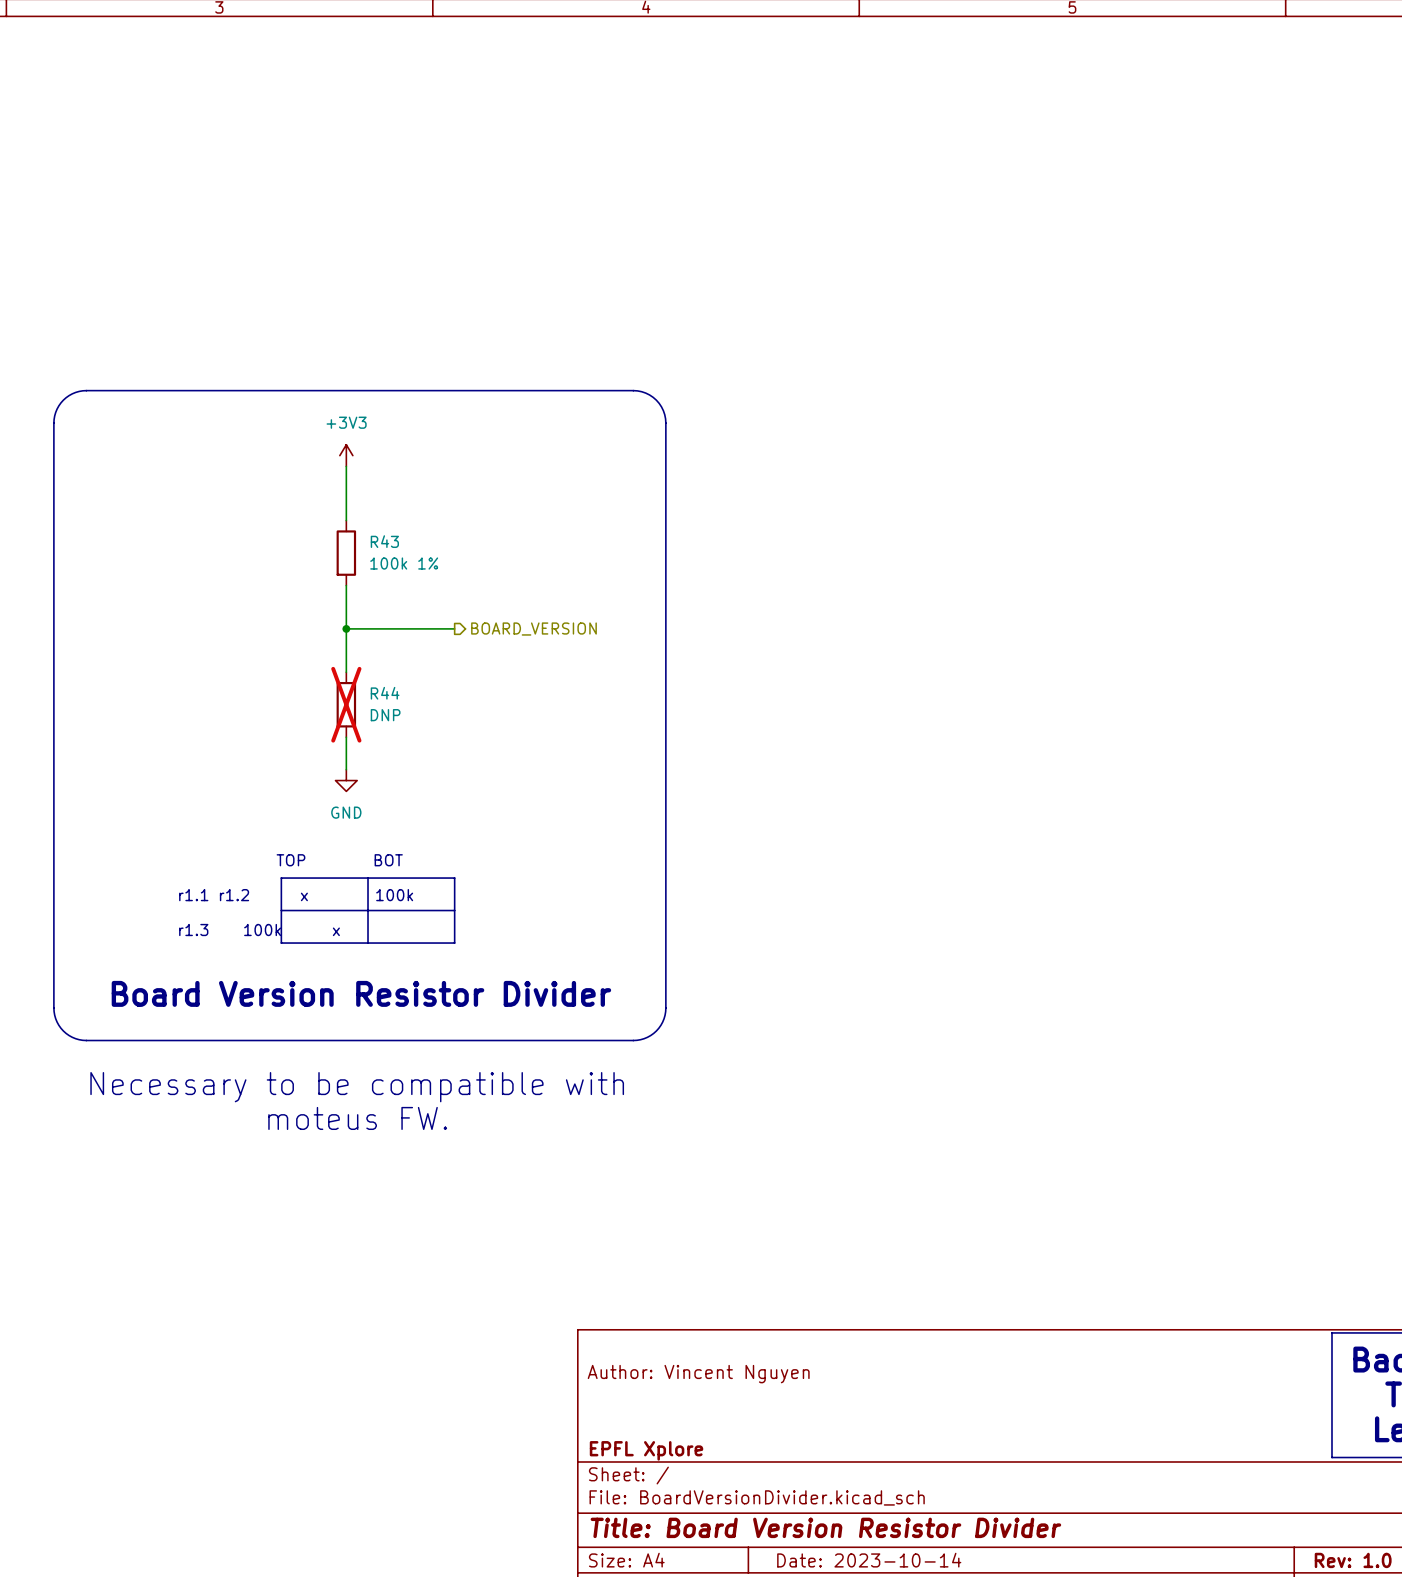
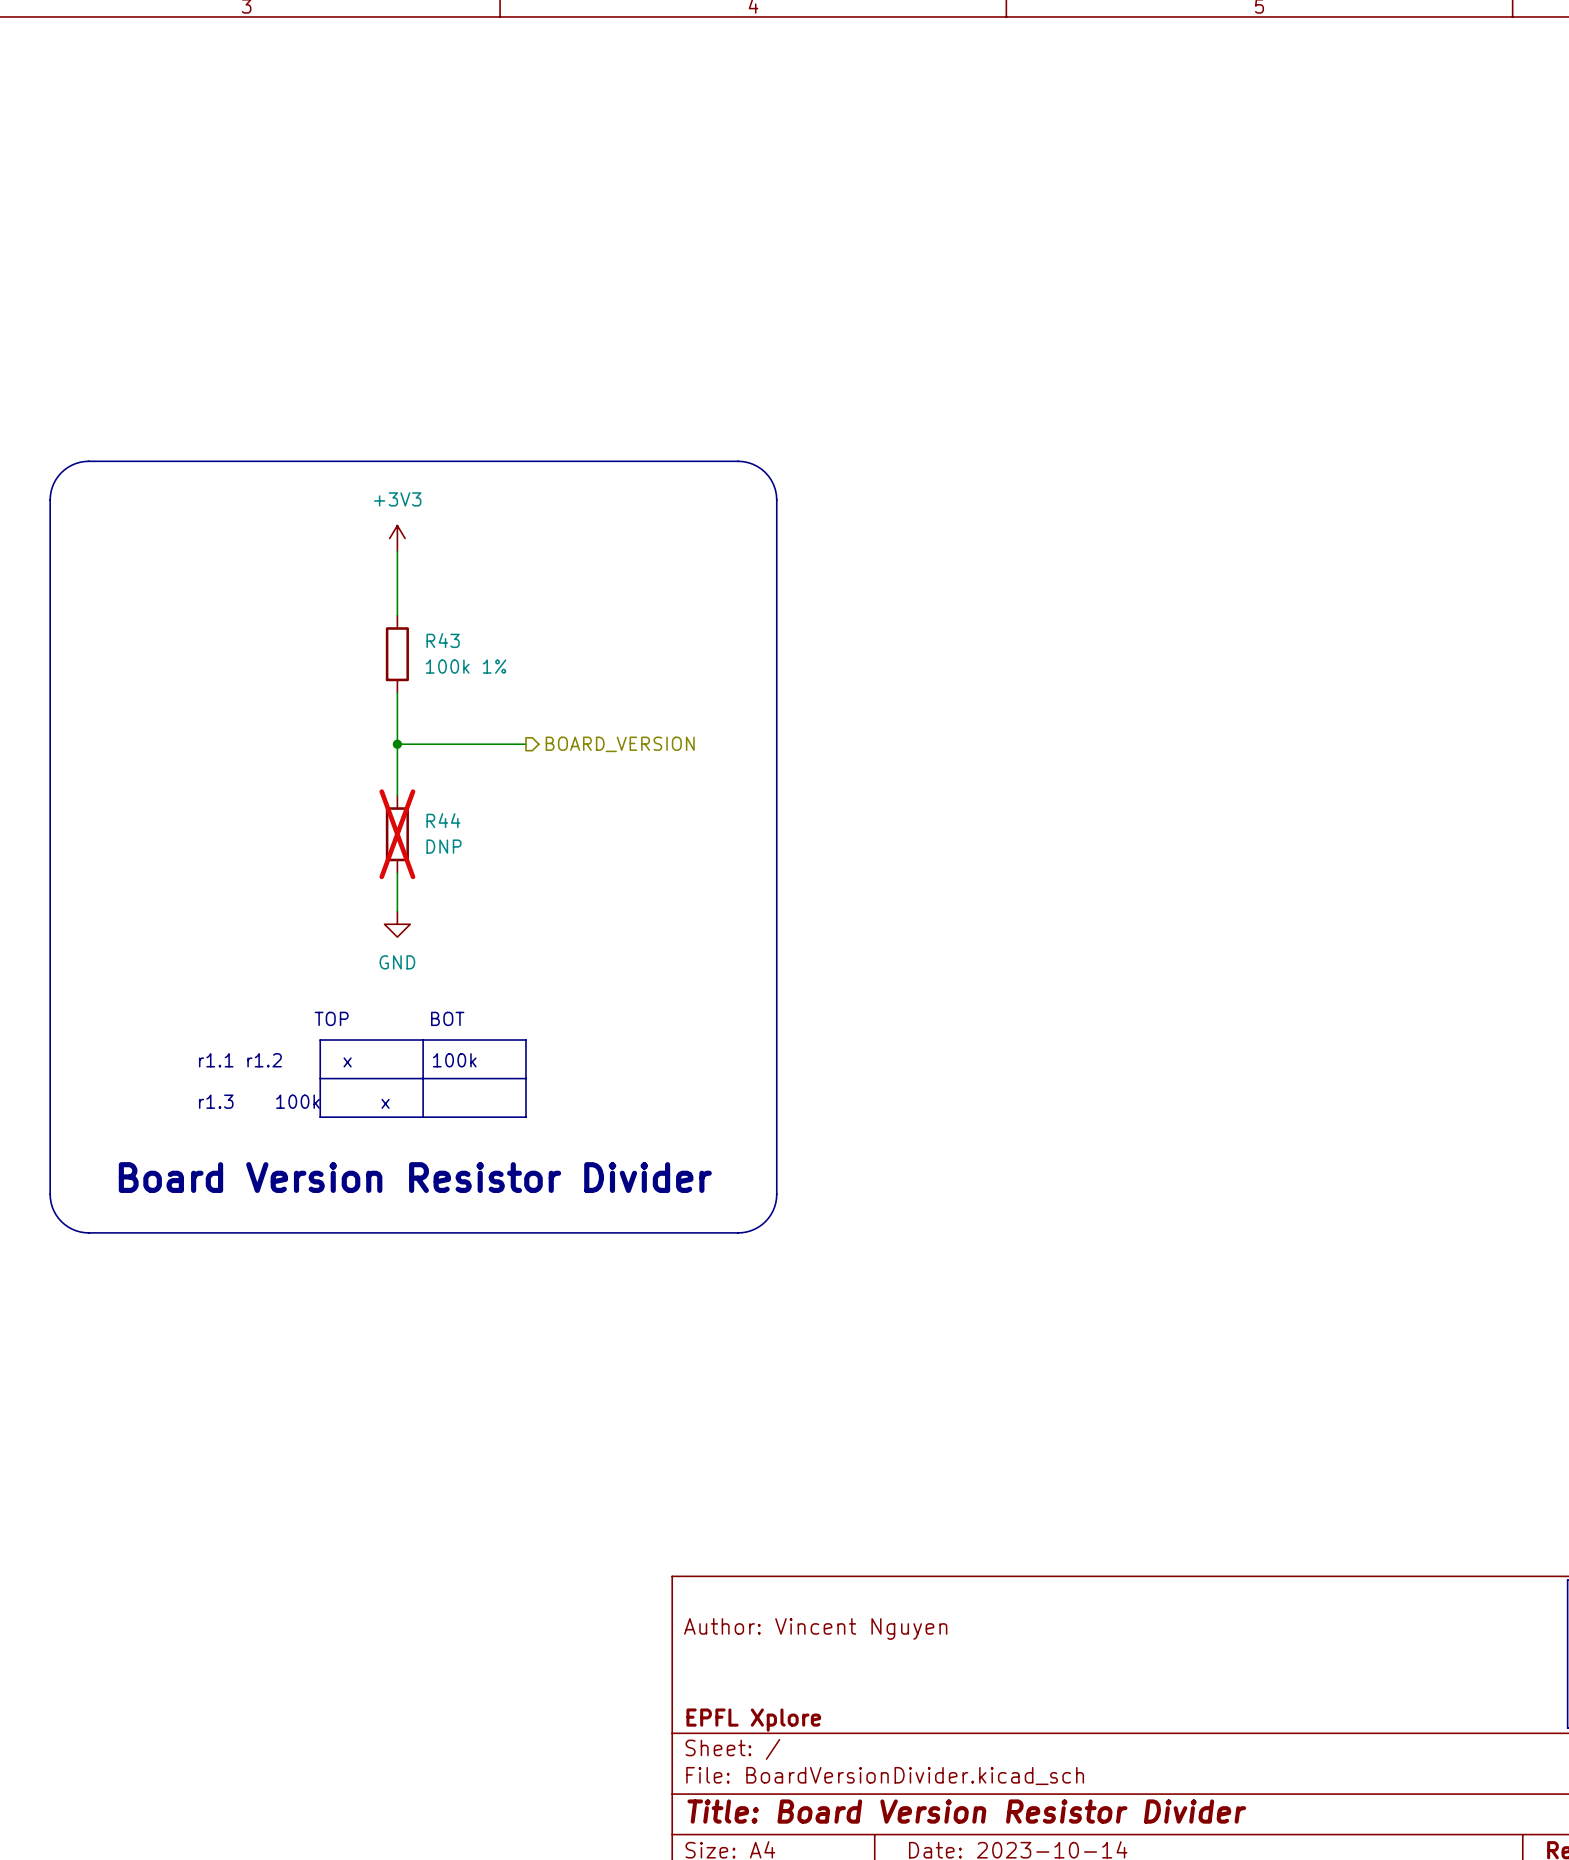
text: Necessary to be compatible with (357, 1087) -> none
text: moteus FW. (357, 1118) -> none

